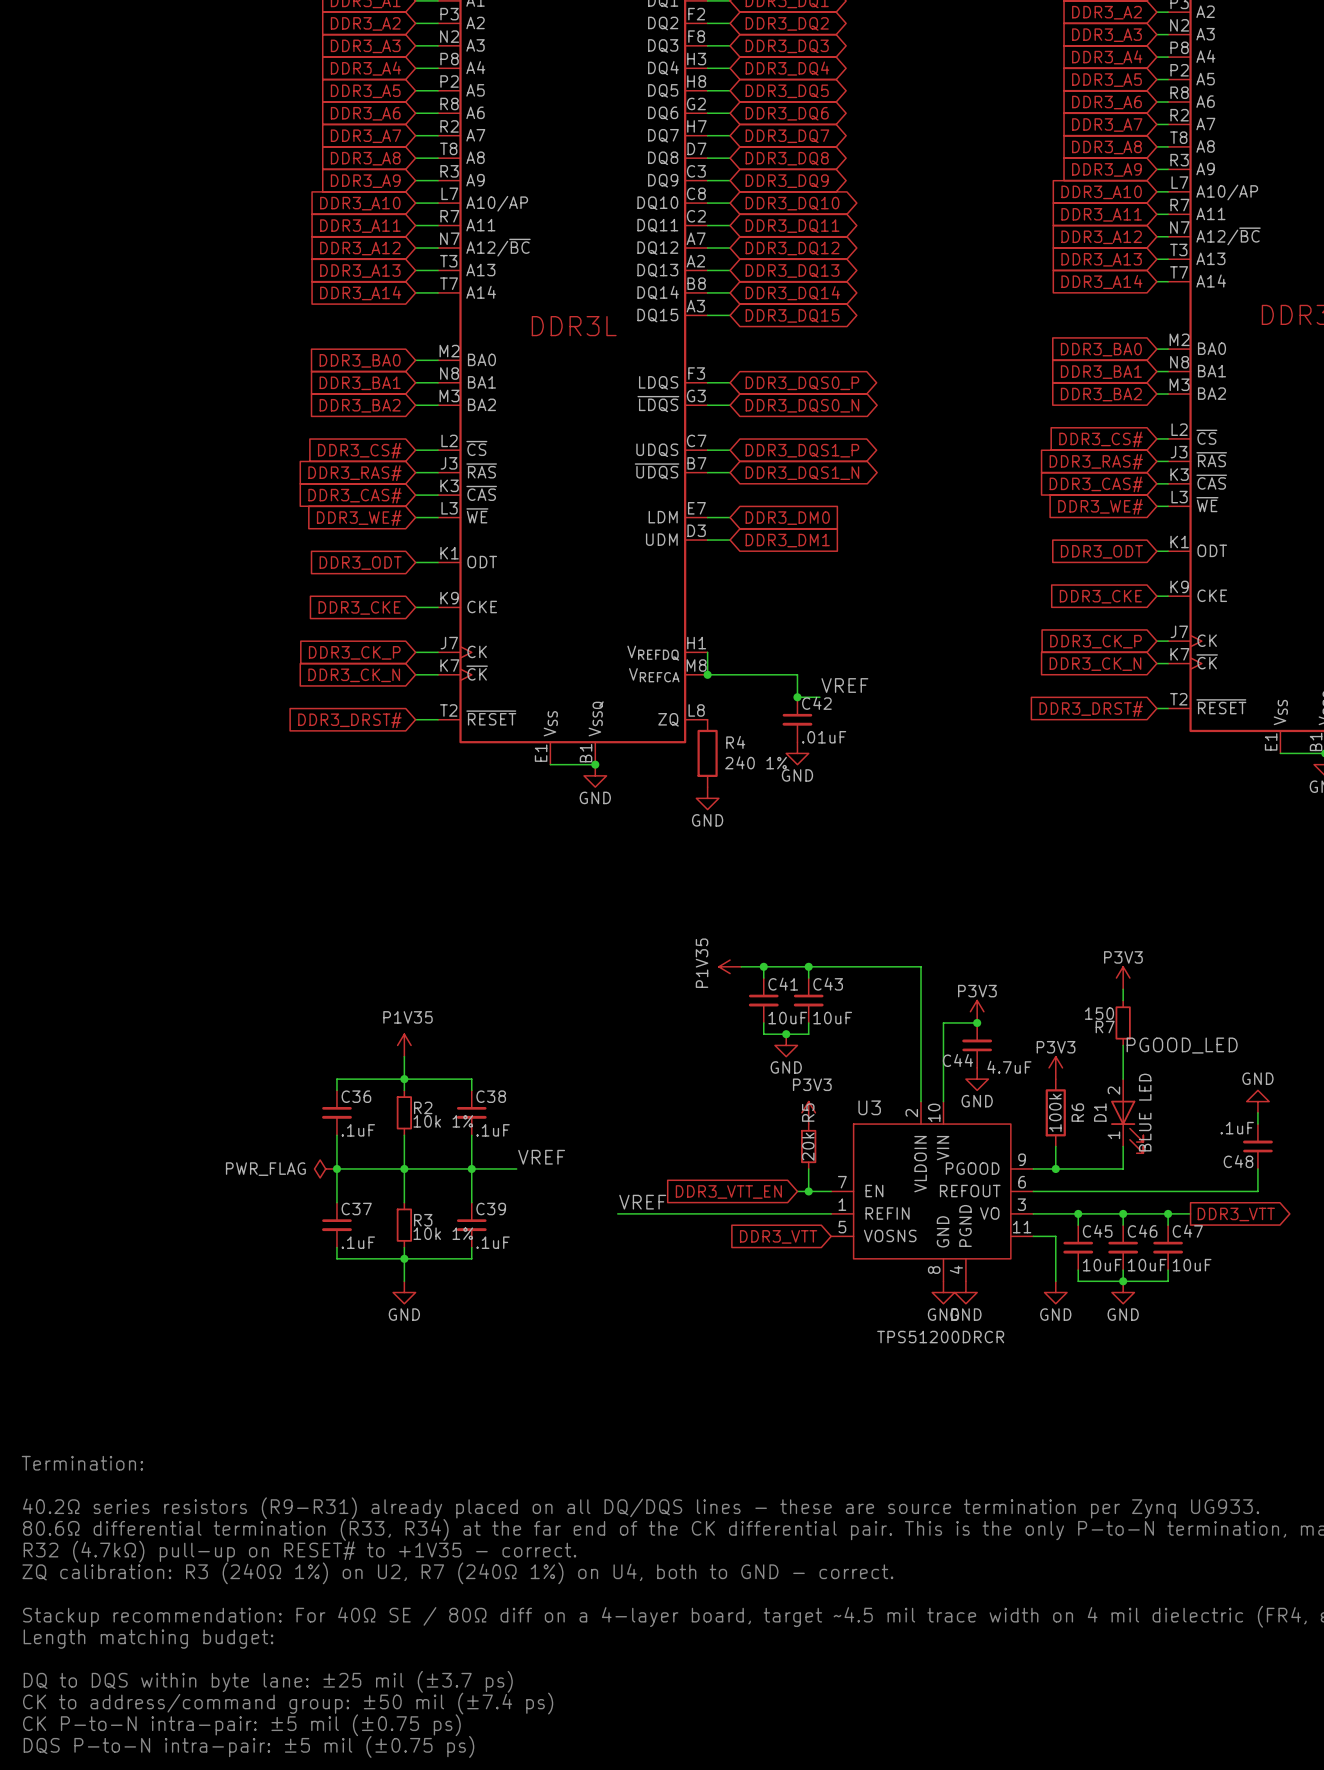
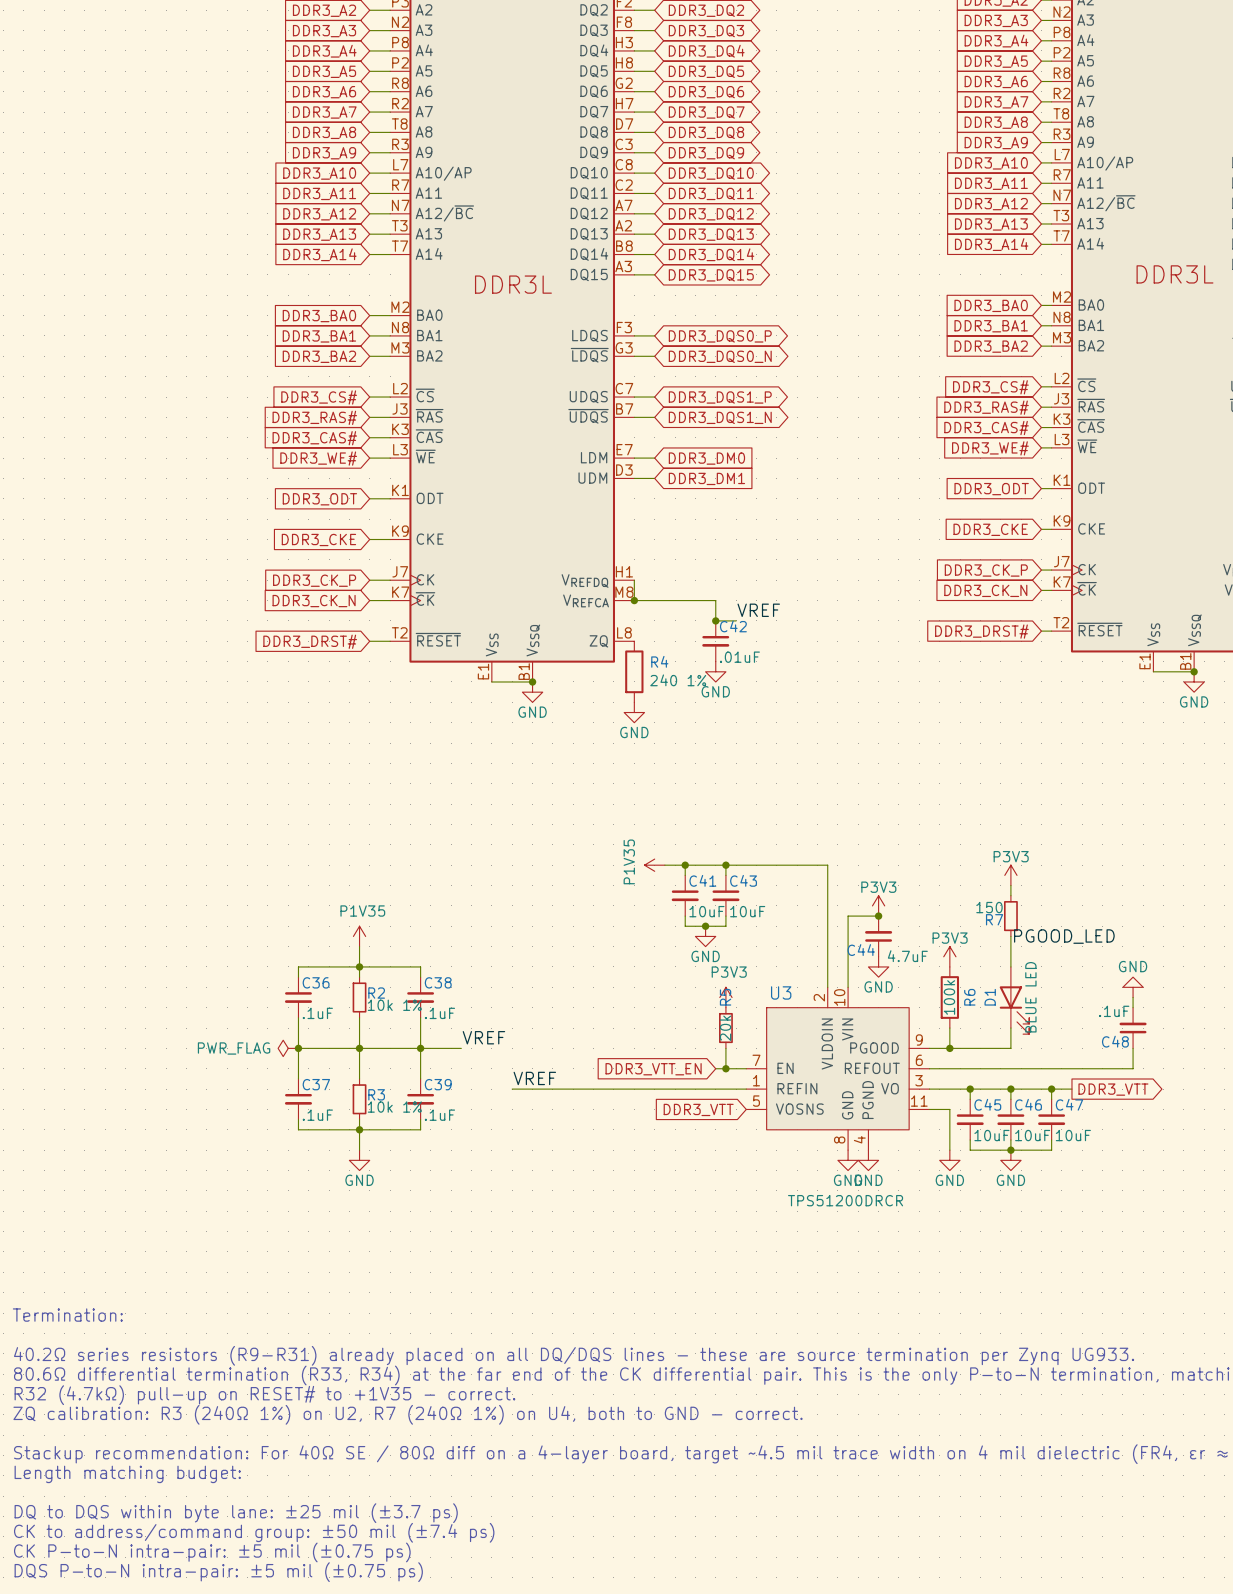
D1 symbol: [1111, 1079, 1144, 1154] -> [999, 966, 1030, 1035]
label position: VREF (642, 1202) -> VREF (534, 1078)
wire: none -> (512, 1089) (552, 1089)

